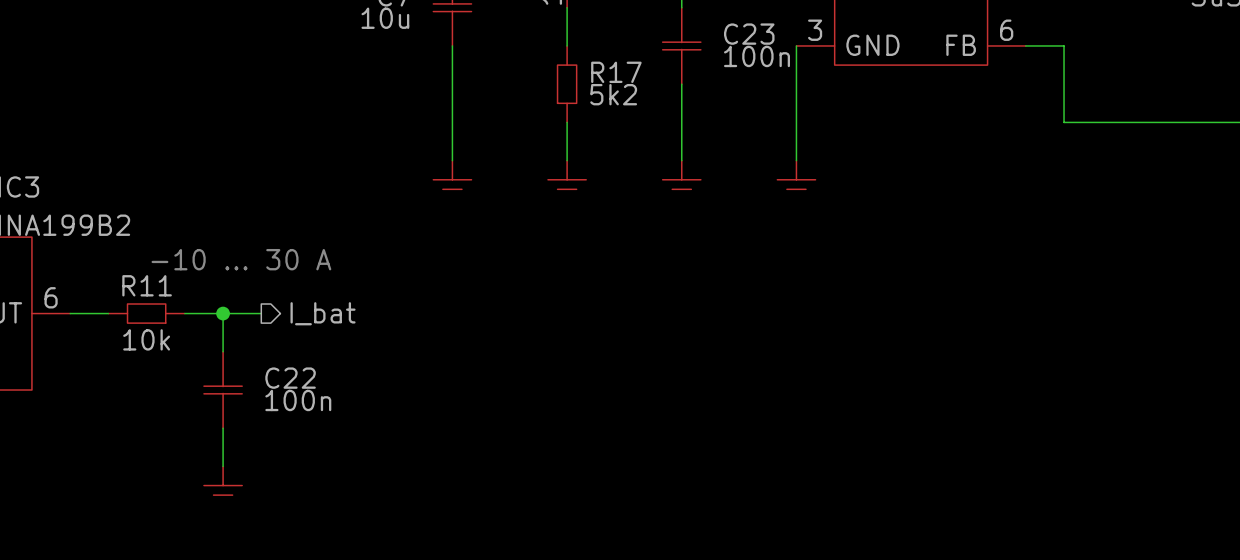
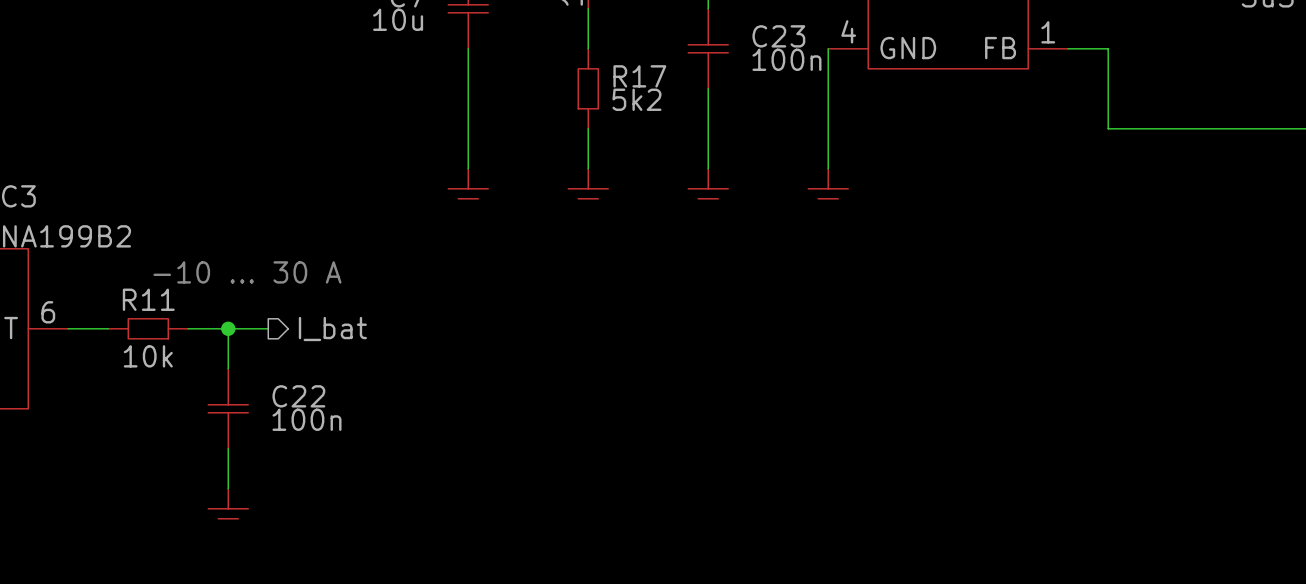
part pin number: 3 (815, 30) -> 4 (848, 31)
part pin number: 6 (1006, 30) -> 1 (1048, 32)

